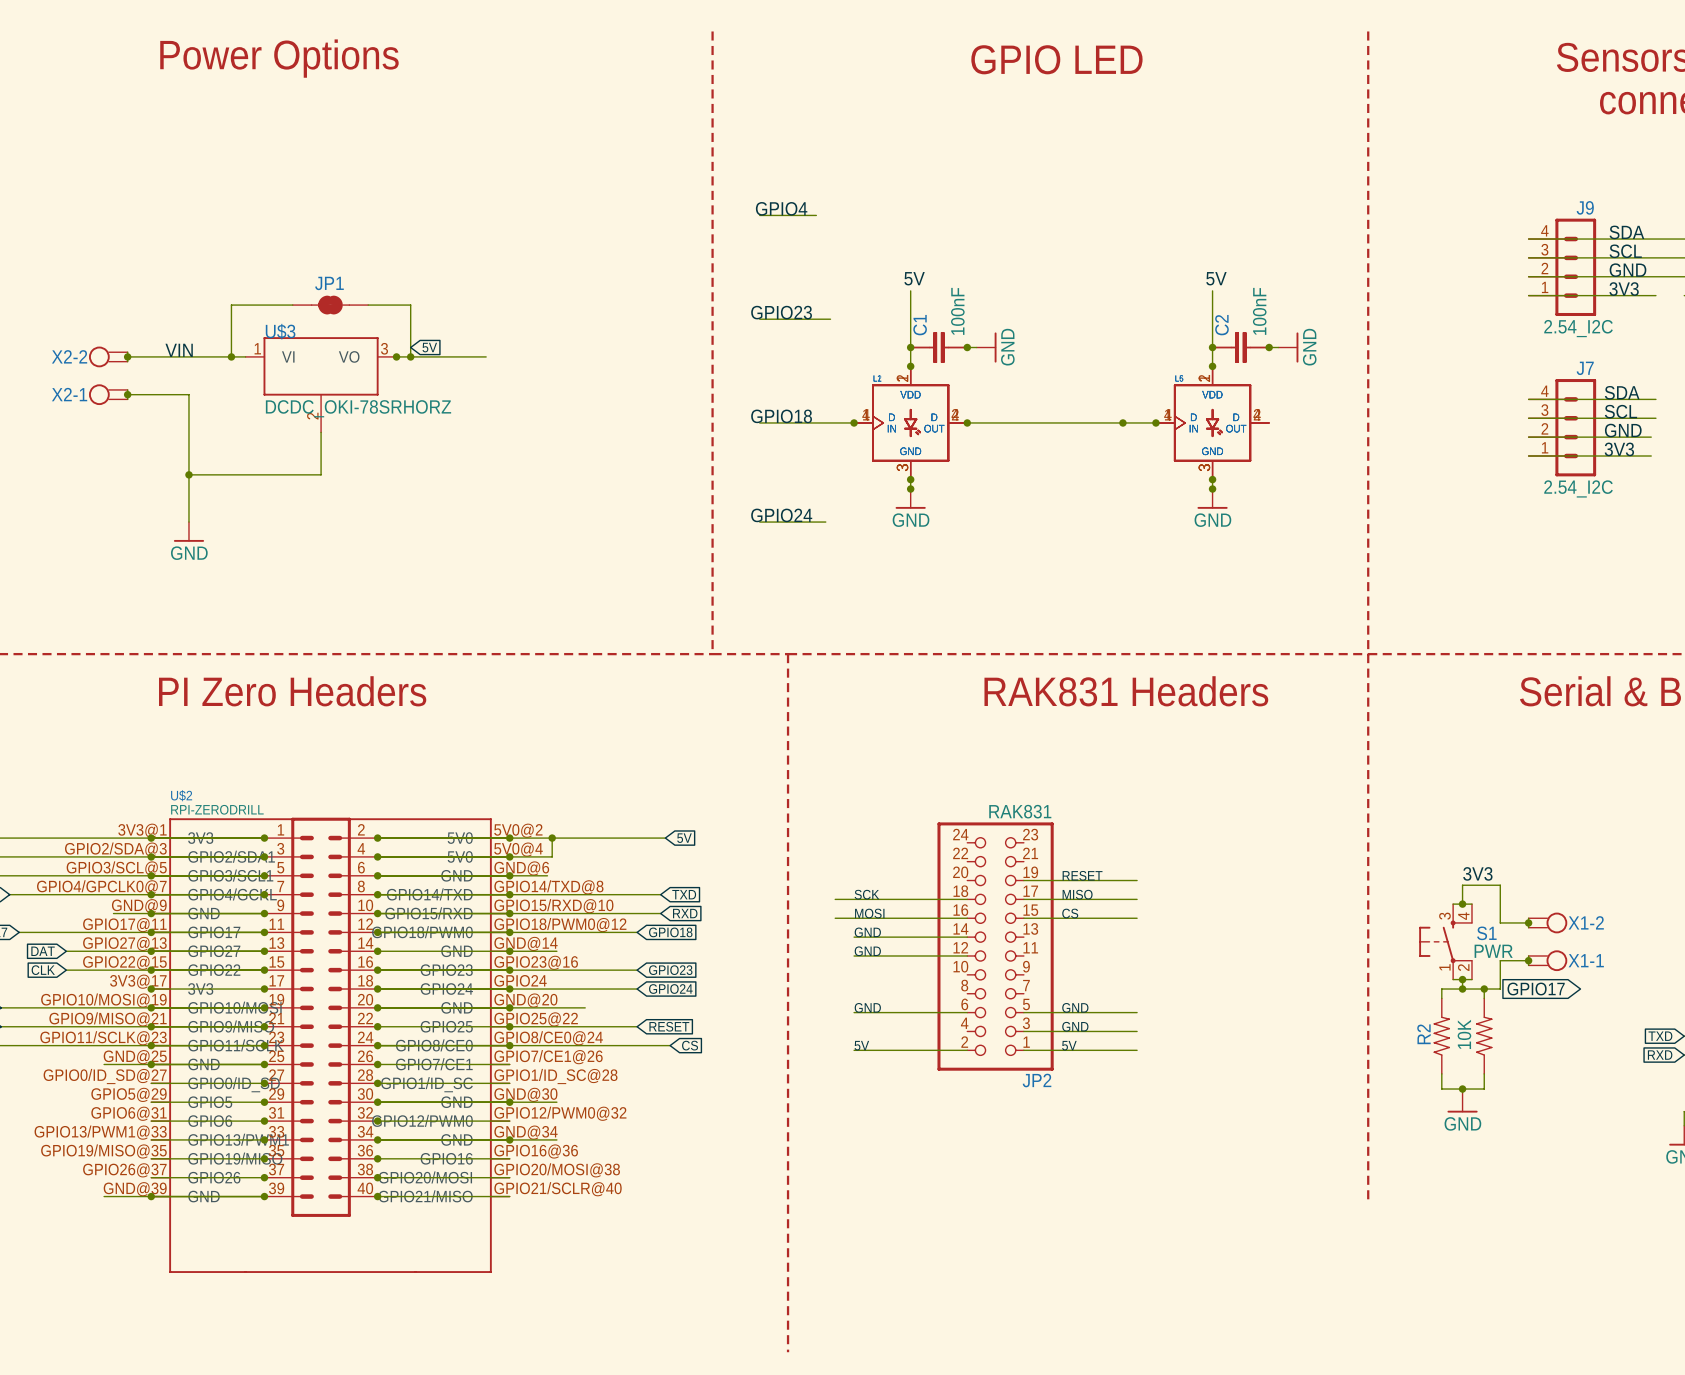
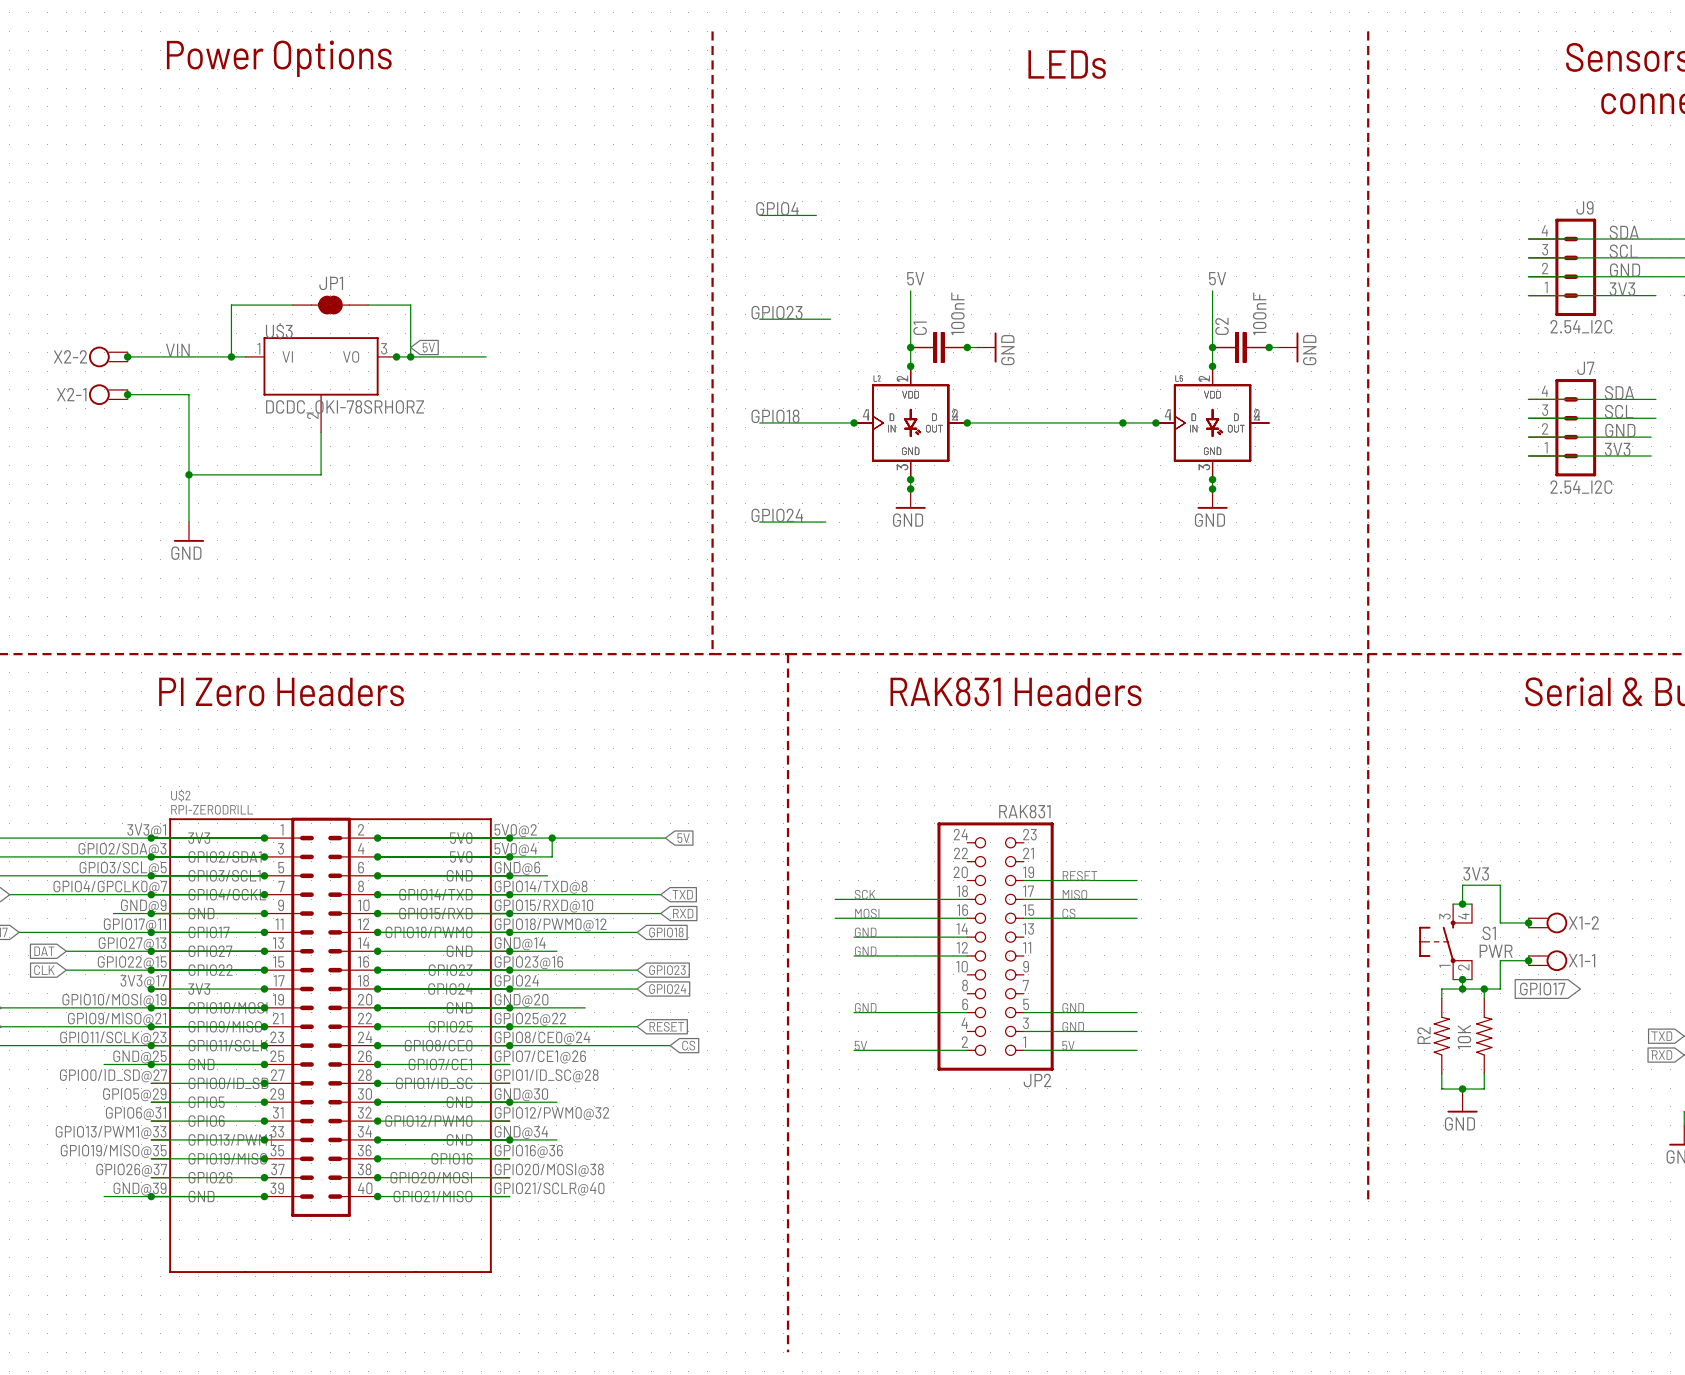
text: GPIO LED (1056, 59) -> none
text: none -> LEDs (1067, 64)
text position: RAK831 Headers (1126, 691) -> RAK831 Headers (1015, 691)

